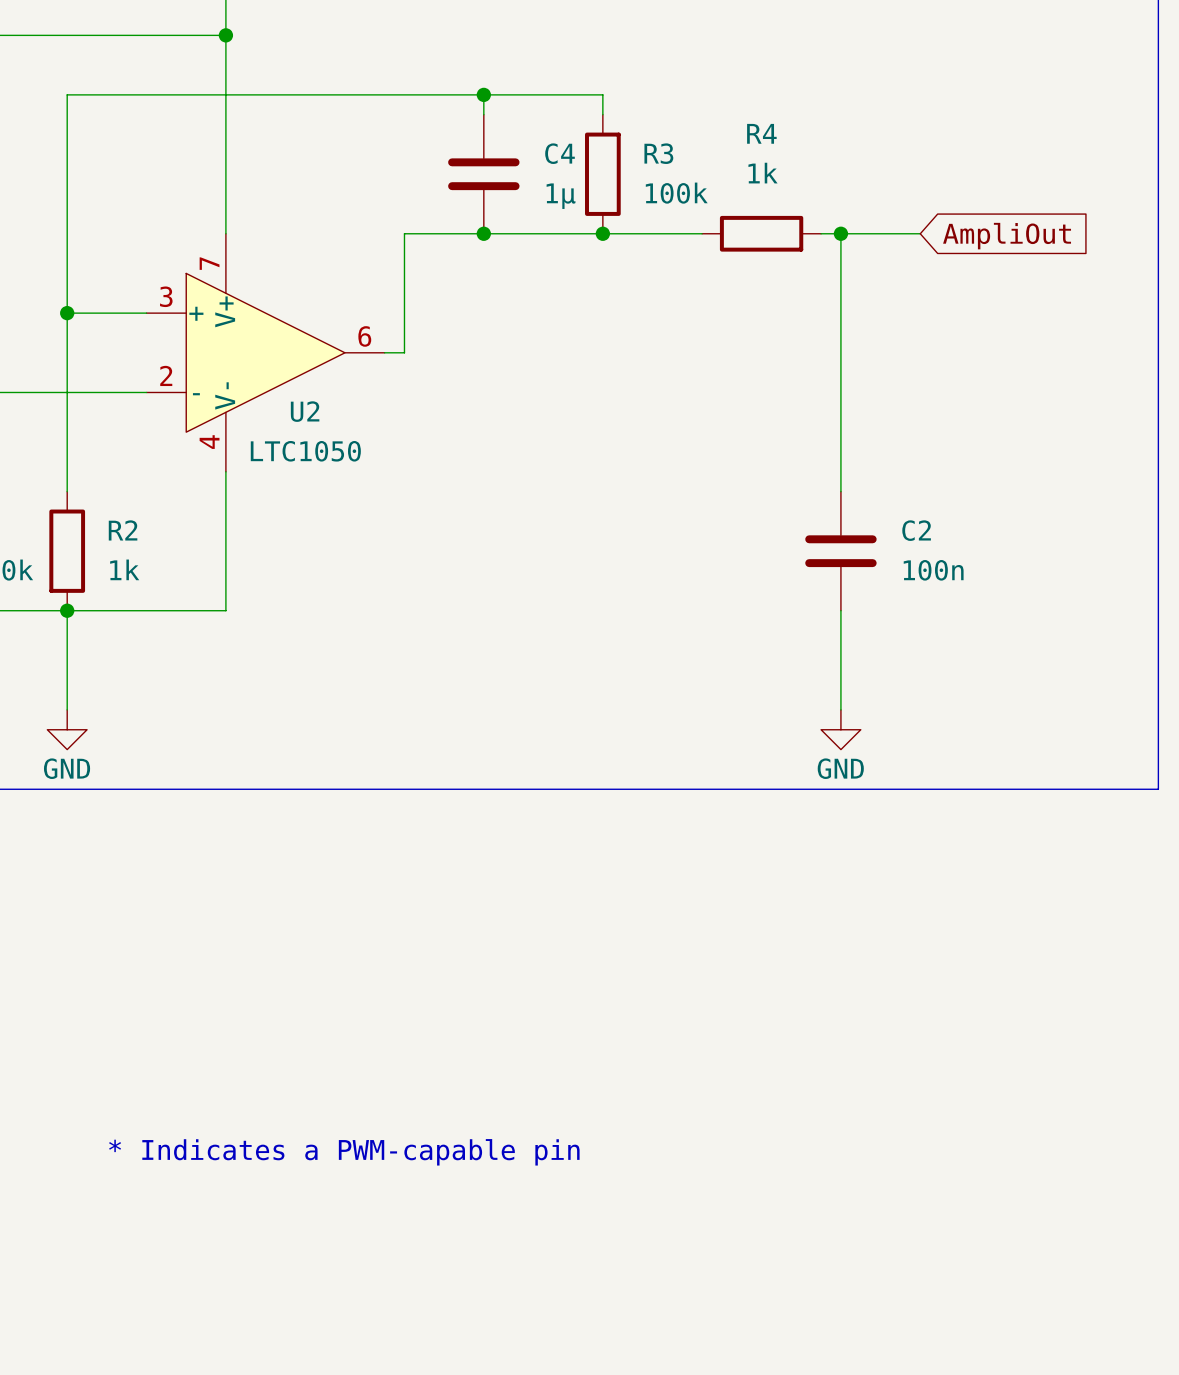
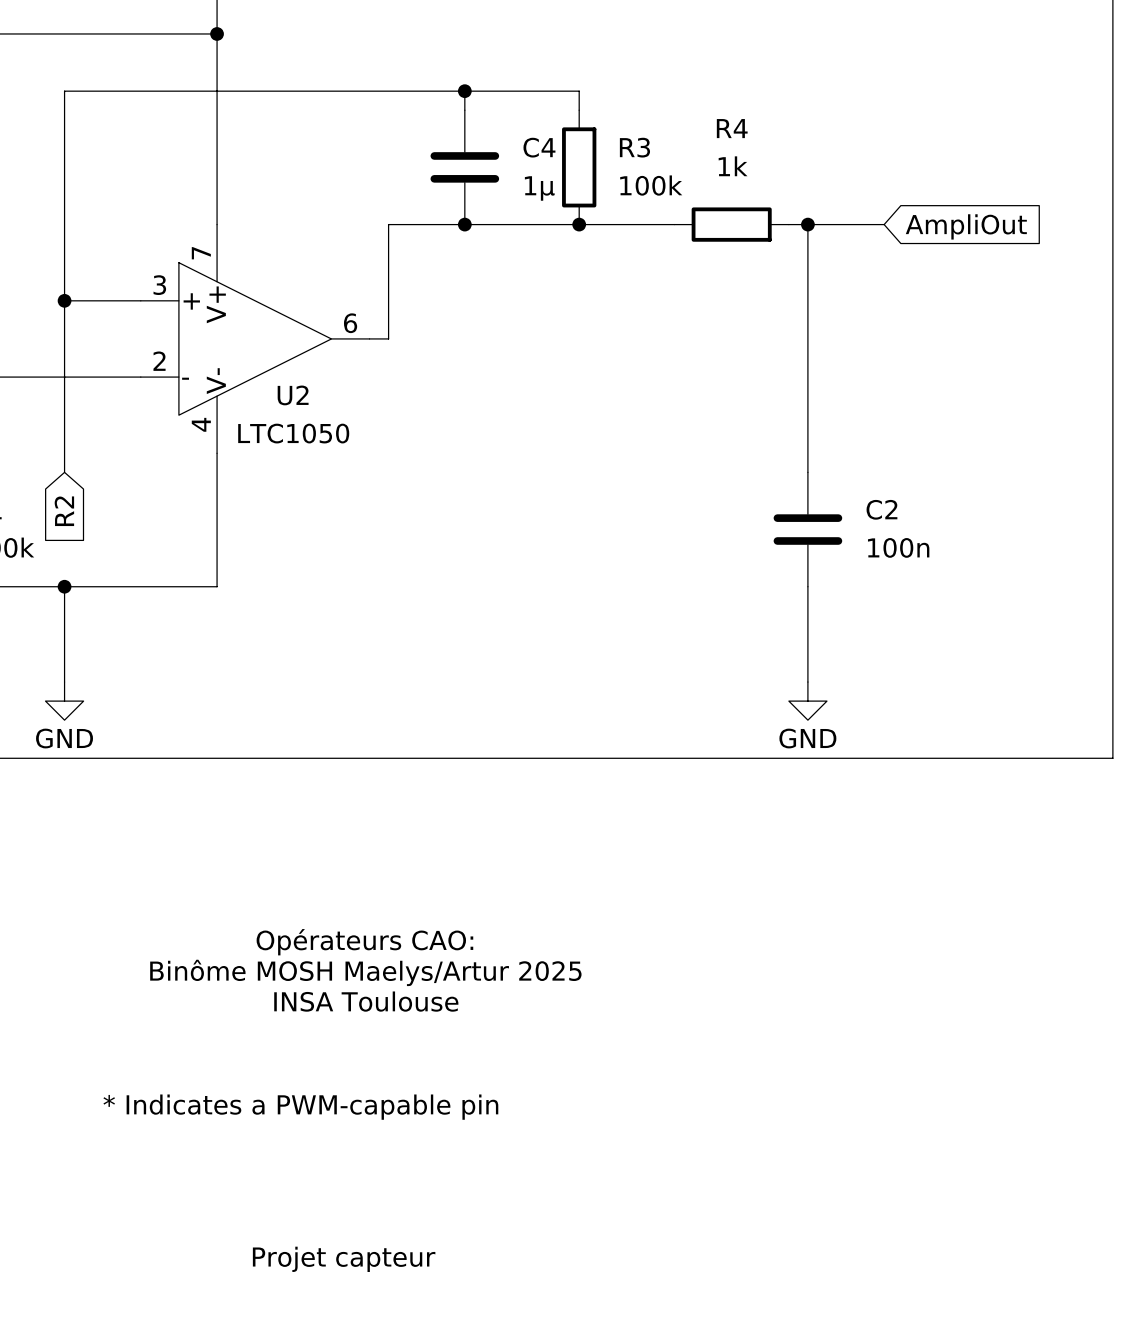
global label: none -> R2 (64, 511)
R2: 1k (67, 551) -> none
text: none -> Opérateurs CAO: (364, 942)
text: none -> Binôme MOSH Maelys/Artur 2025 (365, 972)
text: none -> INSA Toulouse (366, 1001)
text: none -> Projet capteur (344, 1259)

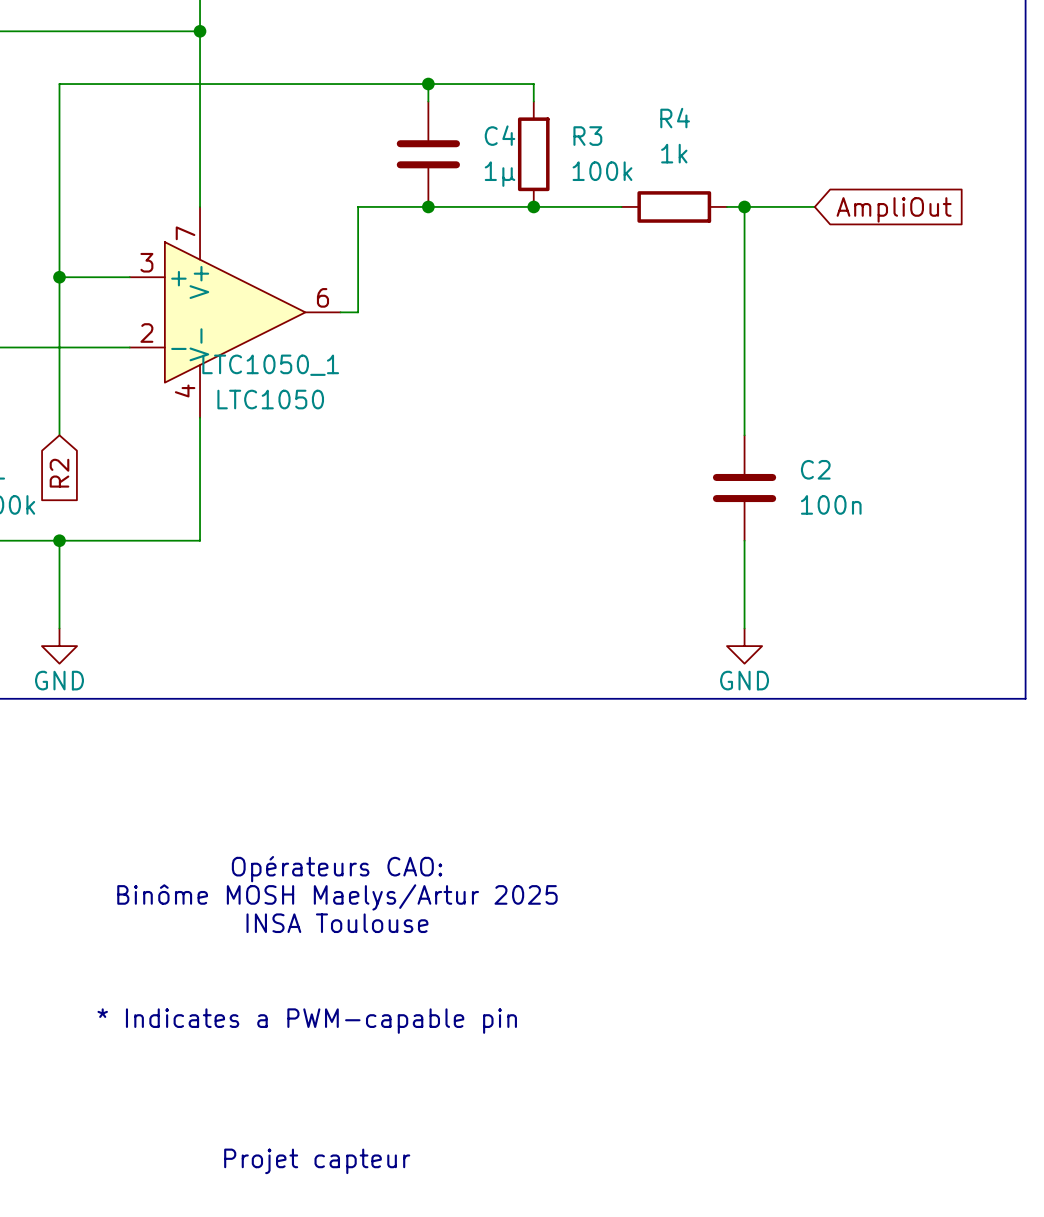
U2 name: U2 (293, 395) -> LTC1050_1 (270, 365)

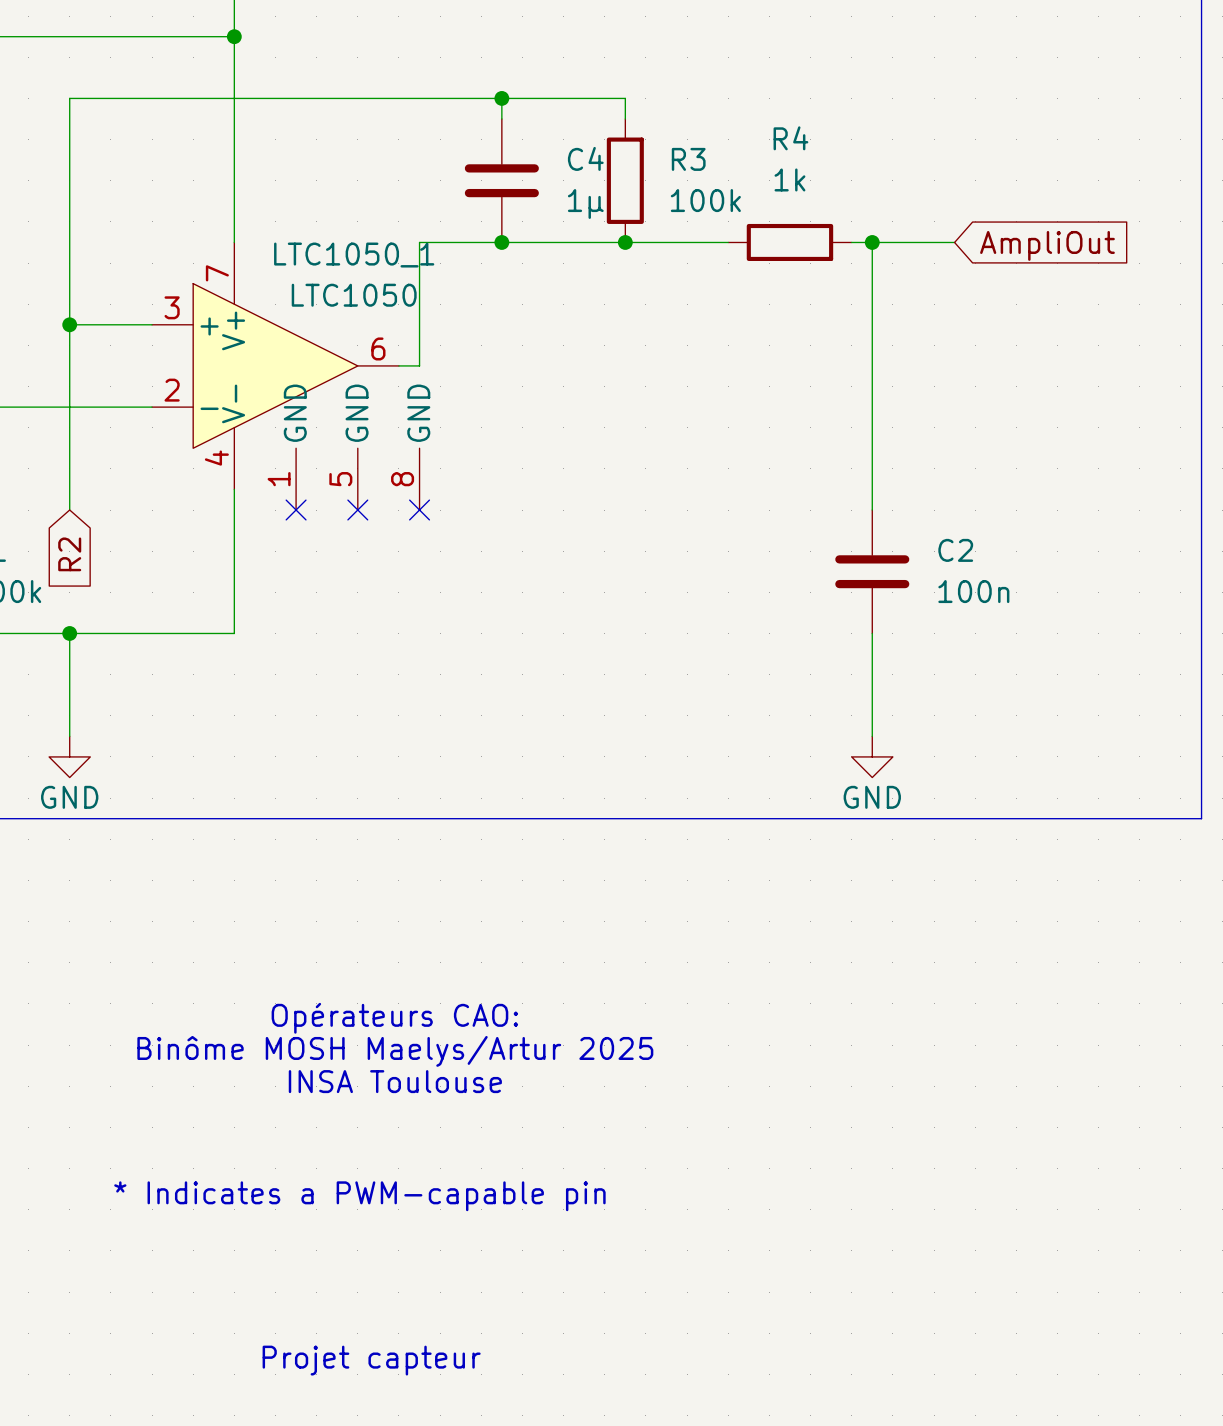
LTC1050_1 symbol: [129, 206, 341, 418] -> [152, 242, 420, 511]
LTC1050_1 name position: LTC1050_1 (270, 365) -> LTC1050_1 (354, 255)
LTC1050_1 value position: LTC1050 (270, 399) -> LTC1050 (354, 295)
no-connect mark: none -> (296, 510)
no-connect mark: none -> (357, 510)
no-connect mark: none -> (419, 510)

